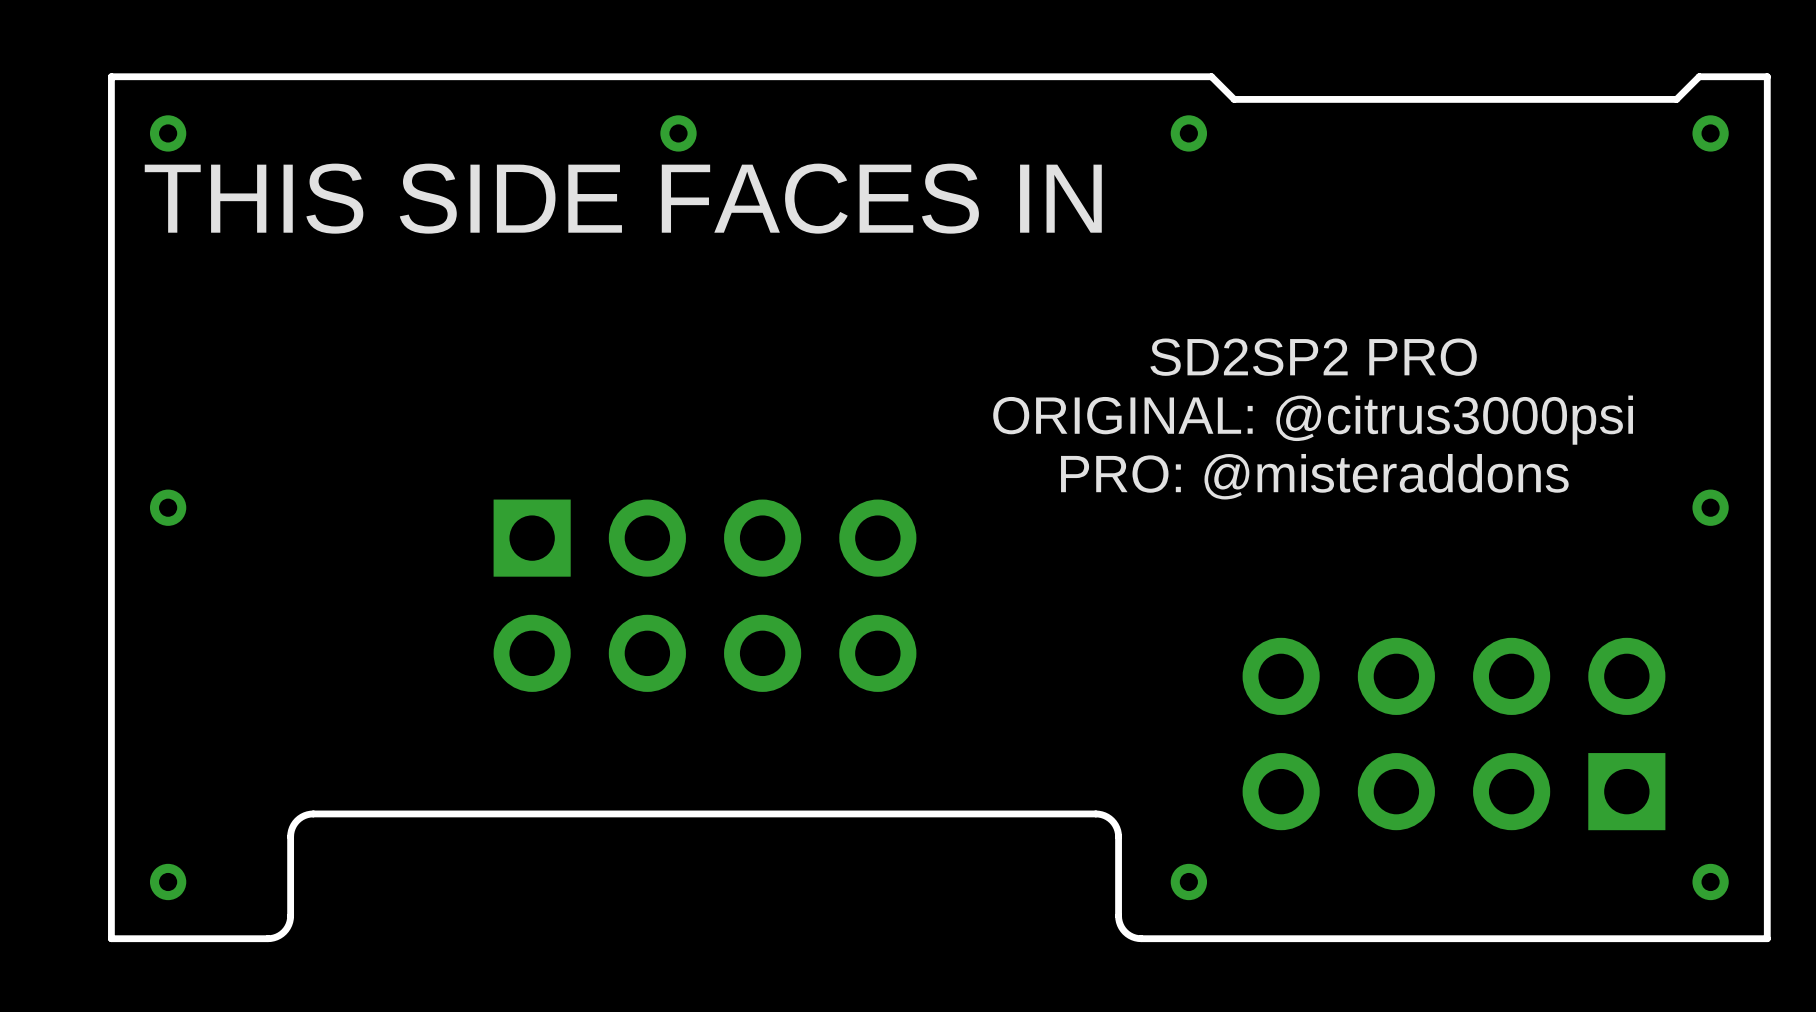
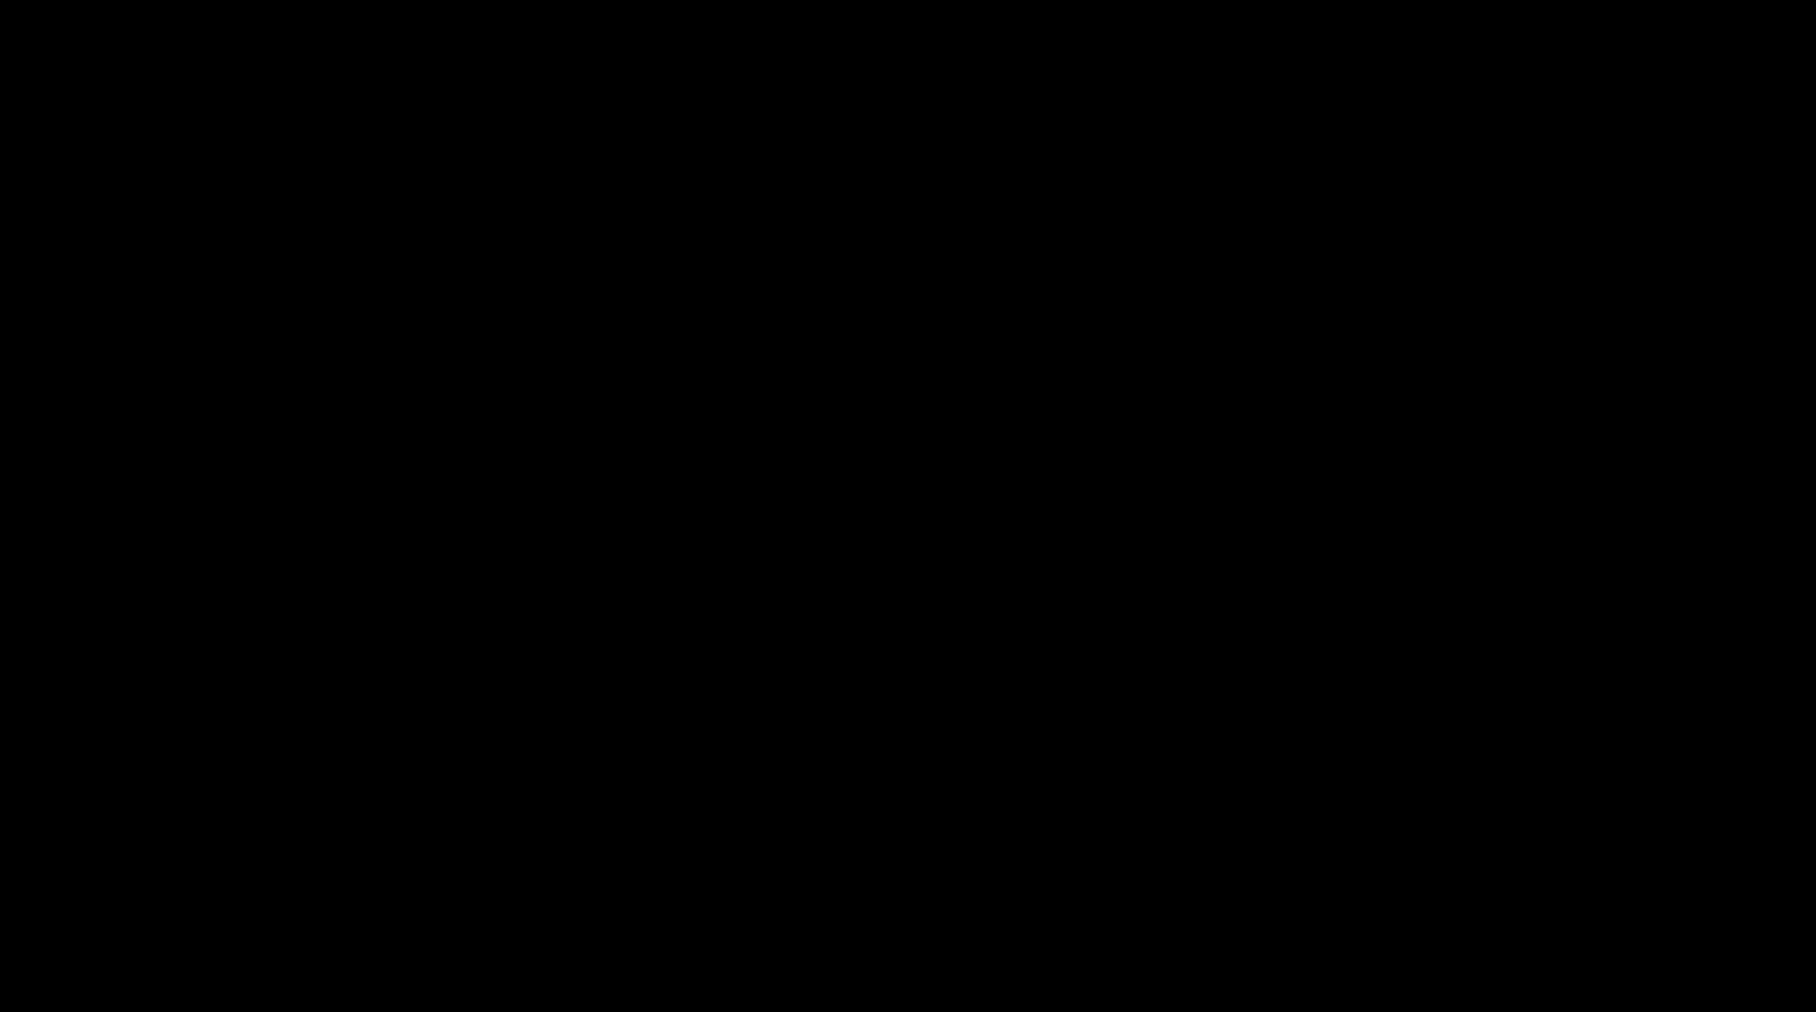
board edge: (1767, 76) (1767, 938) (1138, 938) (1125, 932) (1118, 918) (1118, 836) (1116, 827) (1109, 818) (1095, 813) (310, 814) (297, 820) (291, 830) (290, 918) (287, 927) (279, 935) (267, 938) (111, 938) (111, 76) (1211, 76) (1234, 99) (1676, 99) (1699, 76) (1767, 76) -> none
via: (168, 133) -> none
via: (678, 133) -> none
via: (1188, 133) -> none
via: (1710, 133) -> none
text: THIS SIDE FACES IN (623, 198) -> none
text: SD2SP2 PRO (1313, 357) -> none
text: ORIGINAL: @citrus3000psi (1313, 420) -> none
text: PRO: @misteraddons (1314, 476) -> none
via: (168, 507) -> none
via: (1710, 507) -> none
part: (704, 595) -> none
part: (1454, 734) -> none
via: (168, 881) -> none
via: (1188, 881) -> none
via: (1710, 881) -> none

